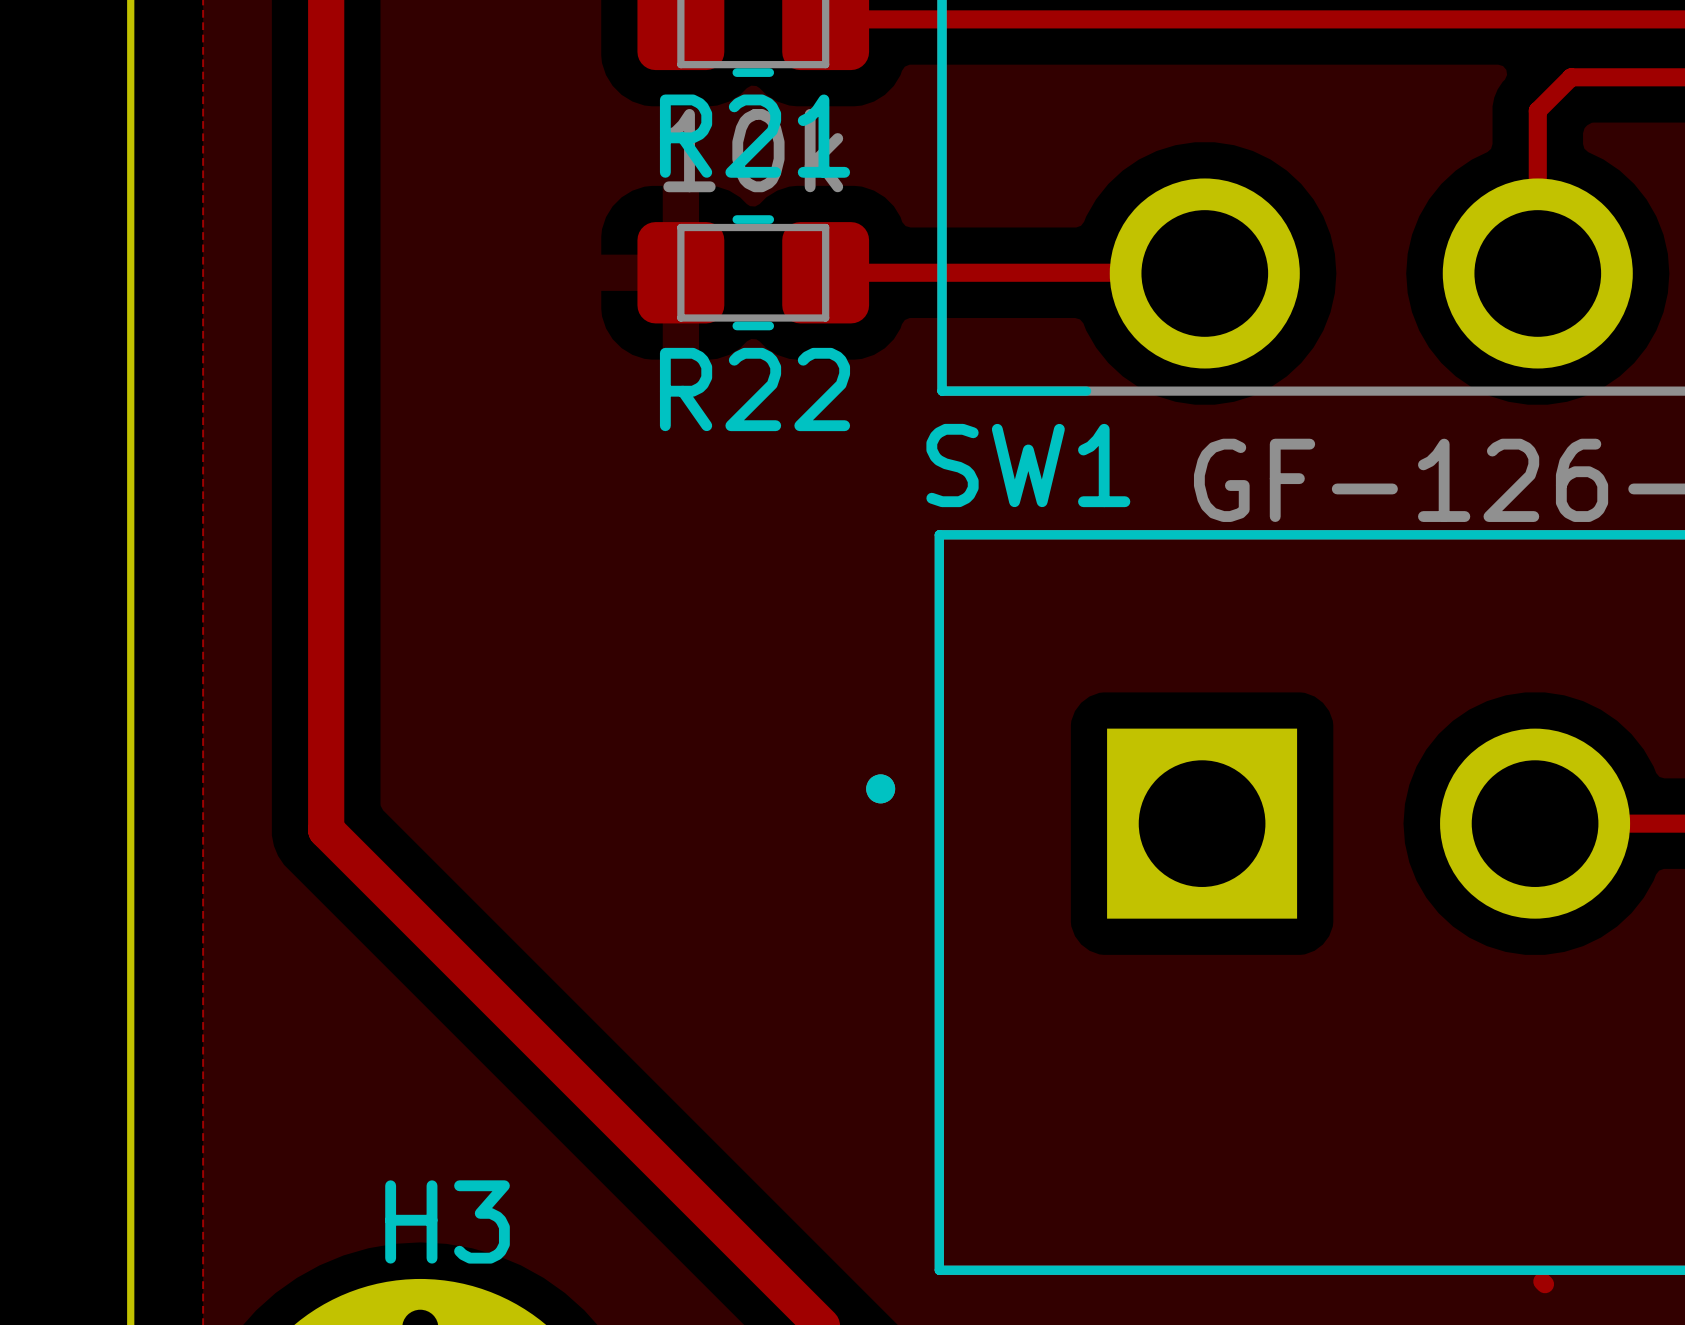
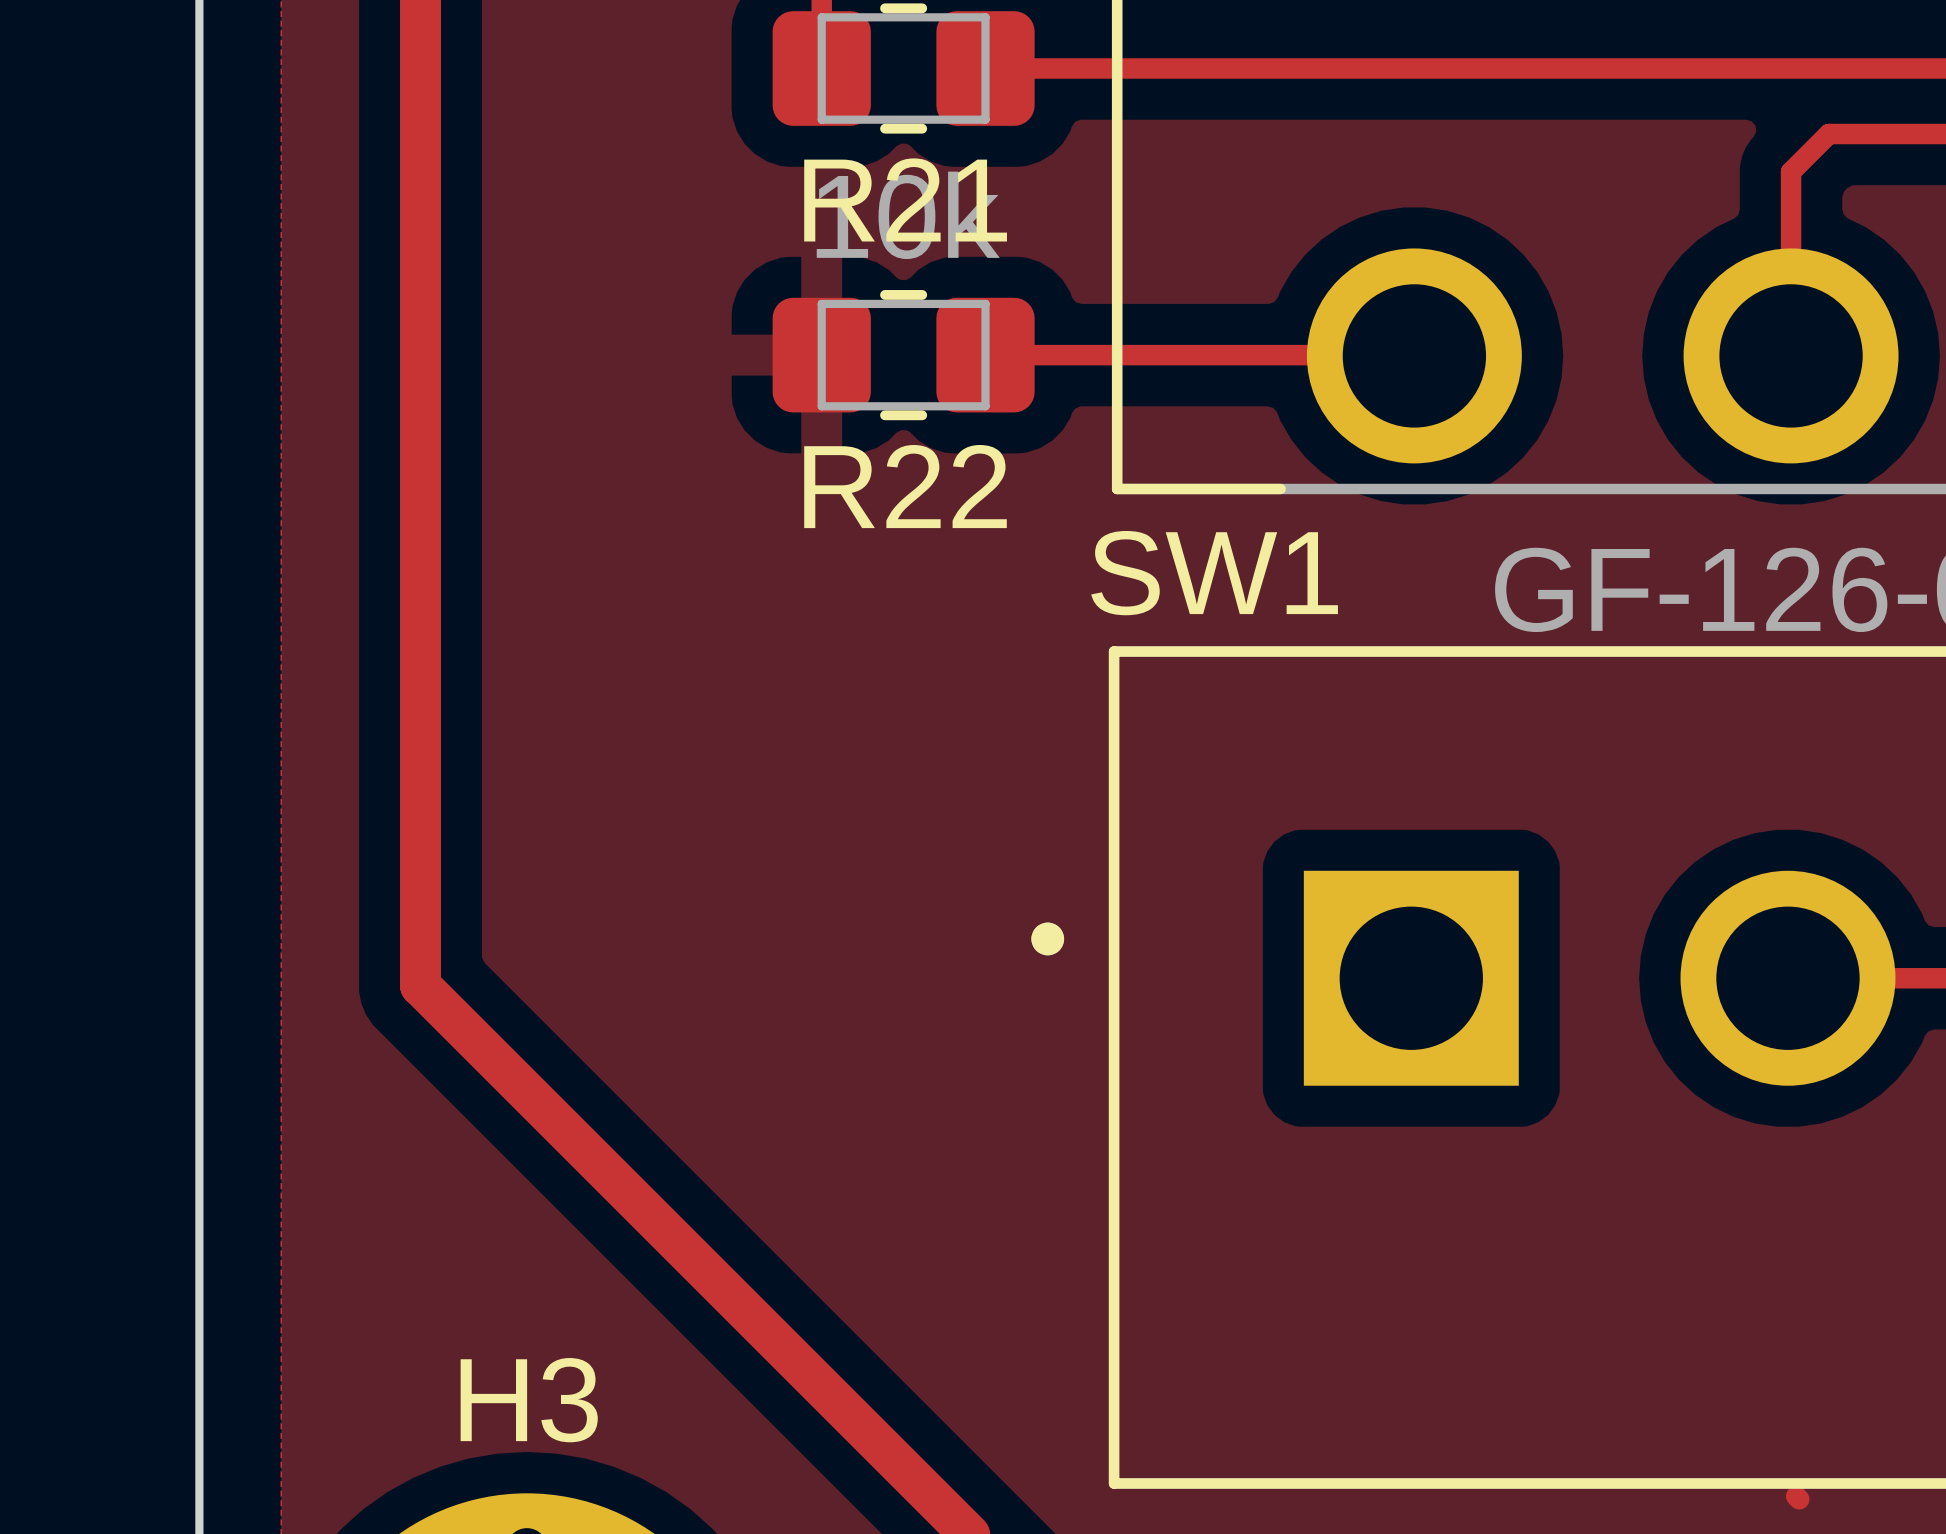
H3 name position: H3 (447, 1221) -> H3 (529, 1400)

